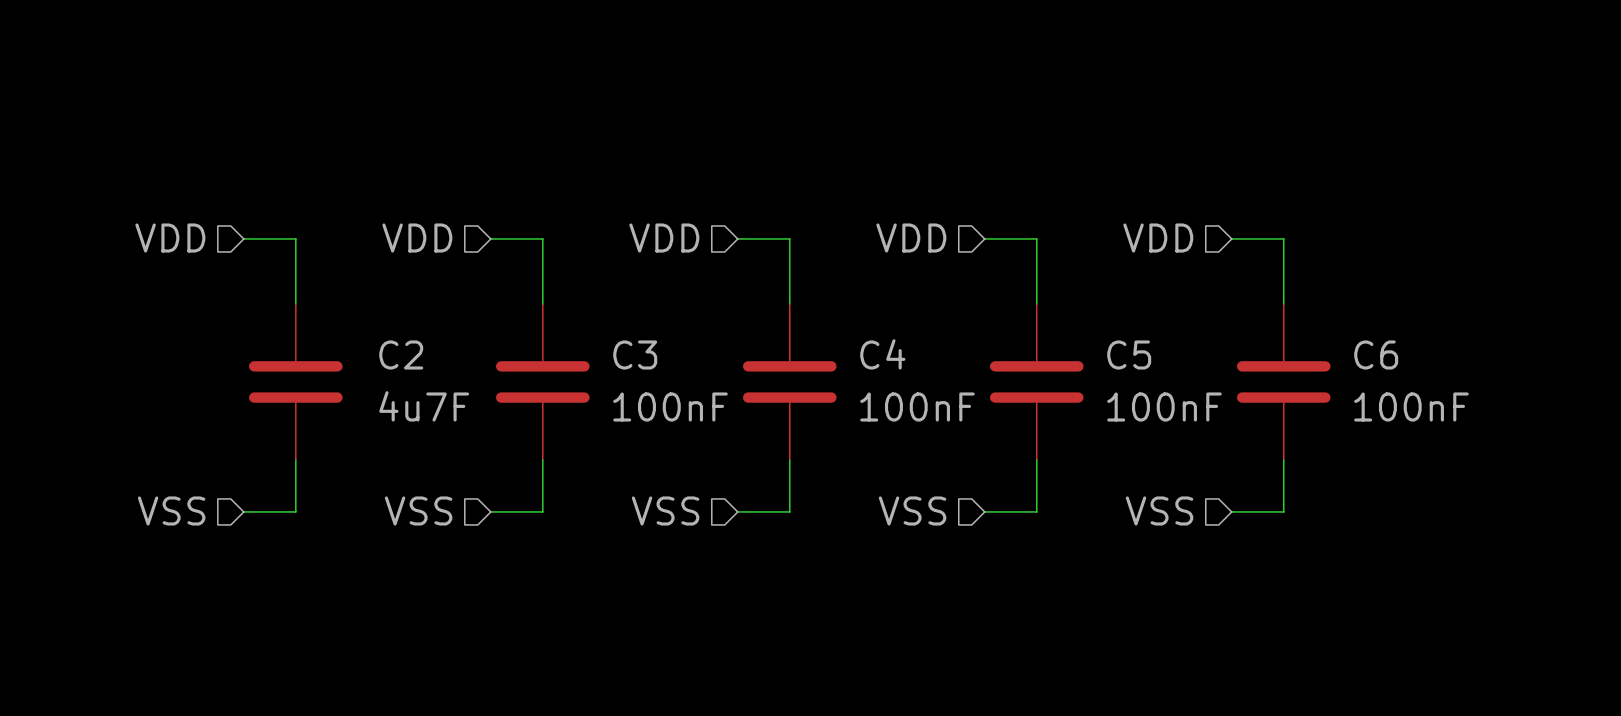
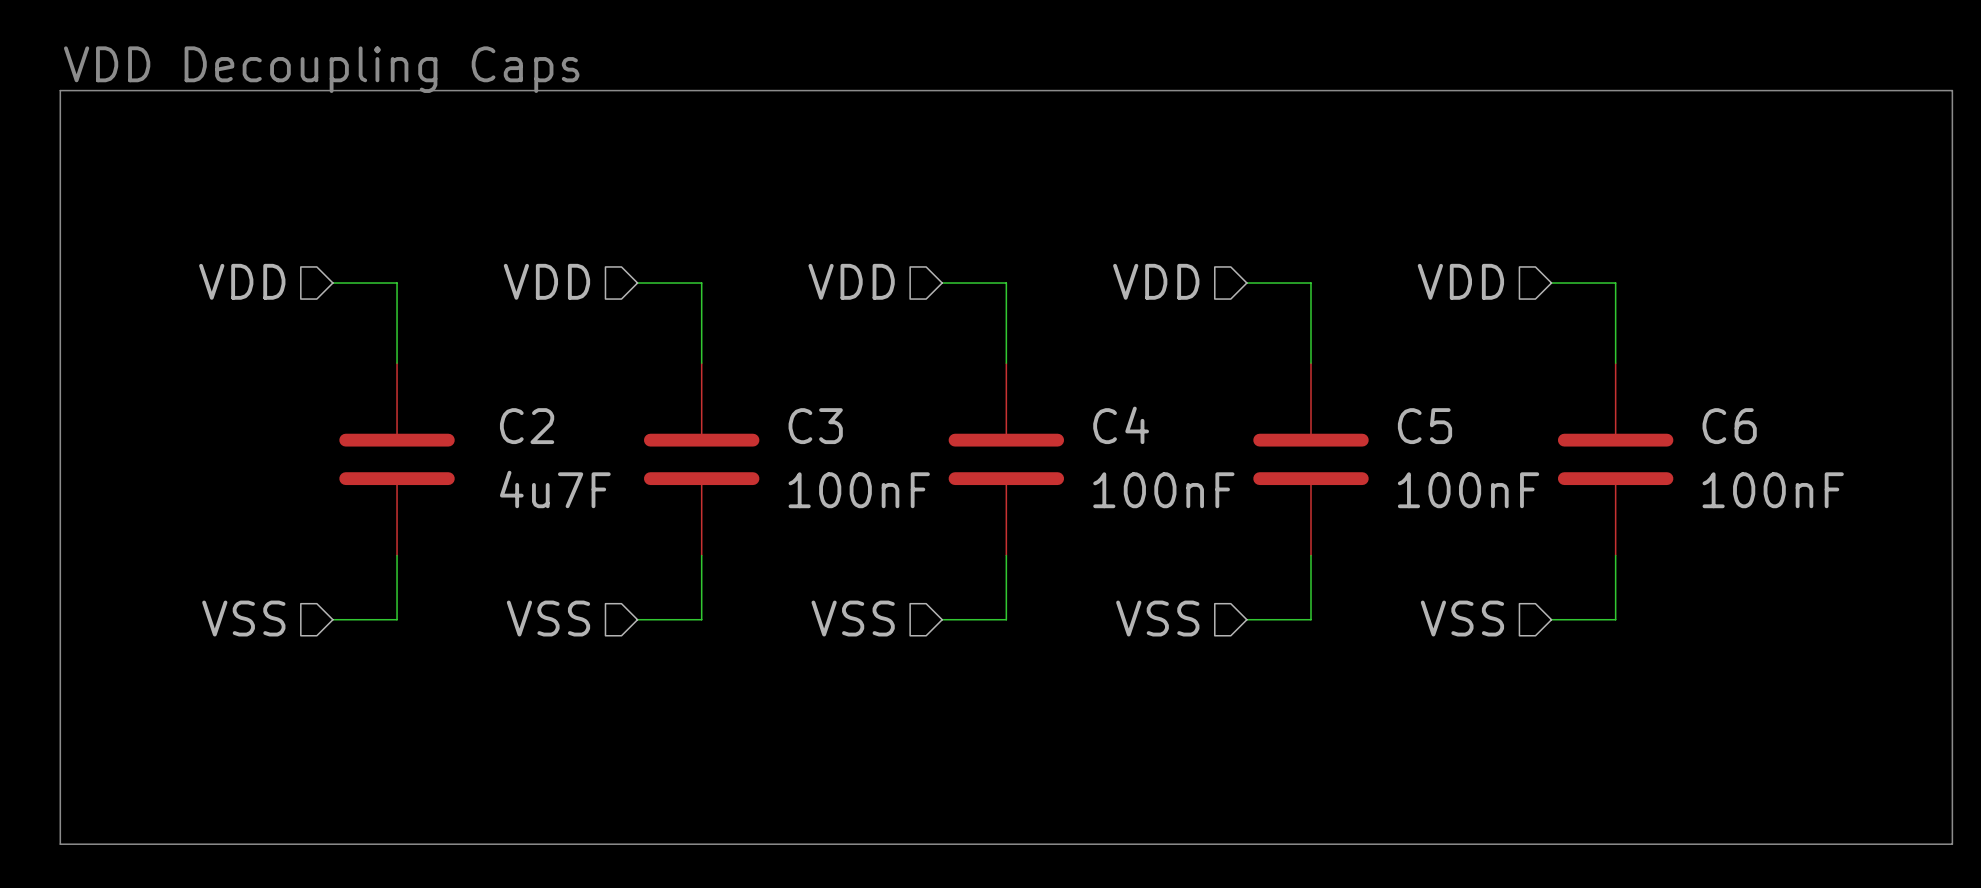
text: none -> VDD Decoupling Caps (321, 69)
line: none -> (60, 90) (1952, 90) (1952, 844) (60, 844) (60, 90)

